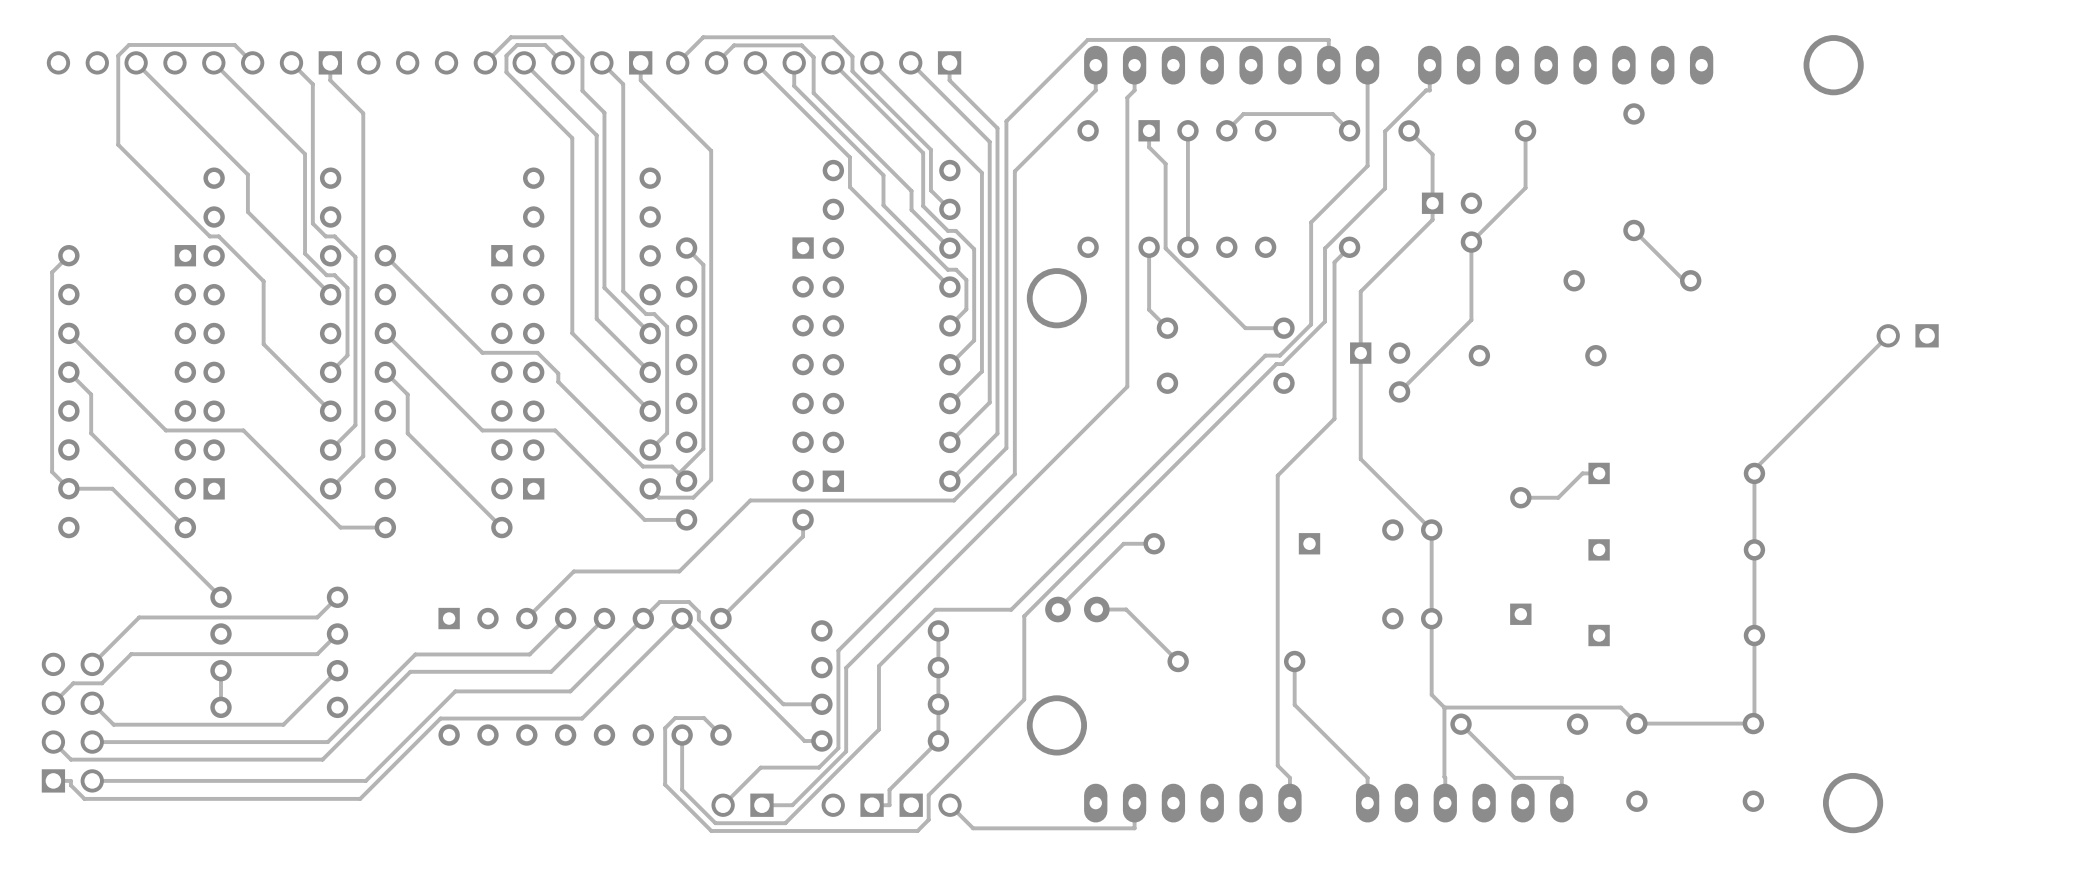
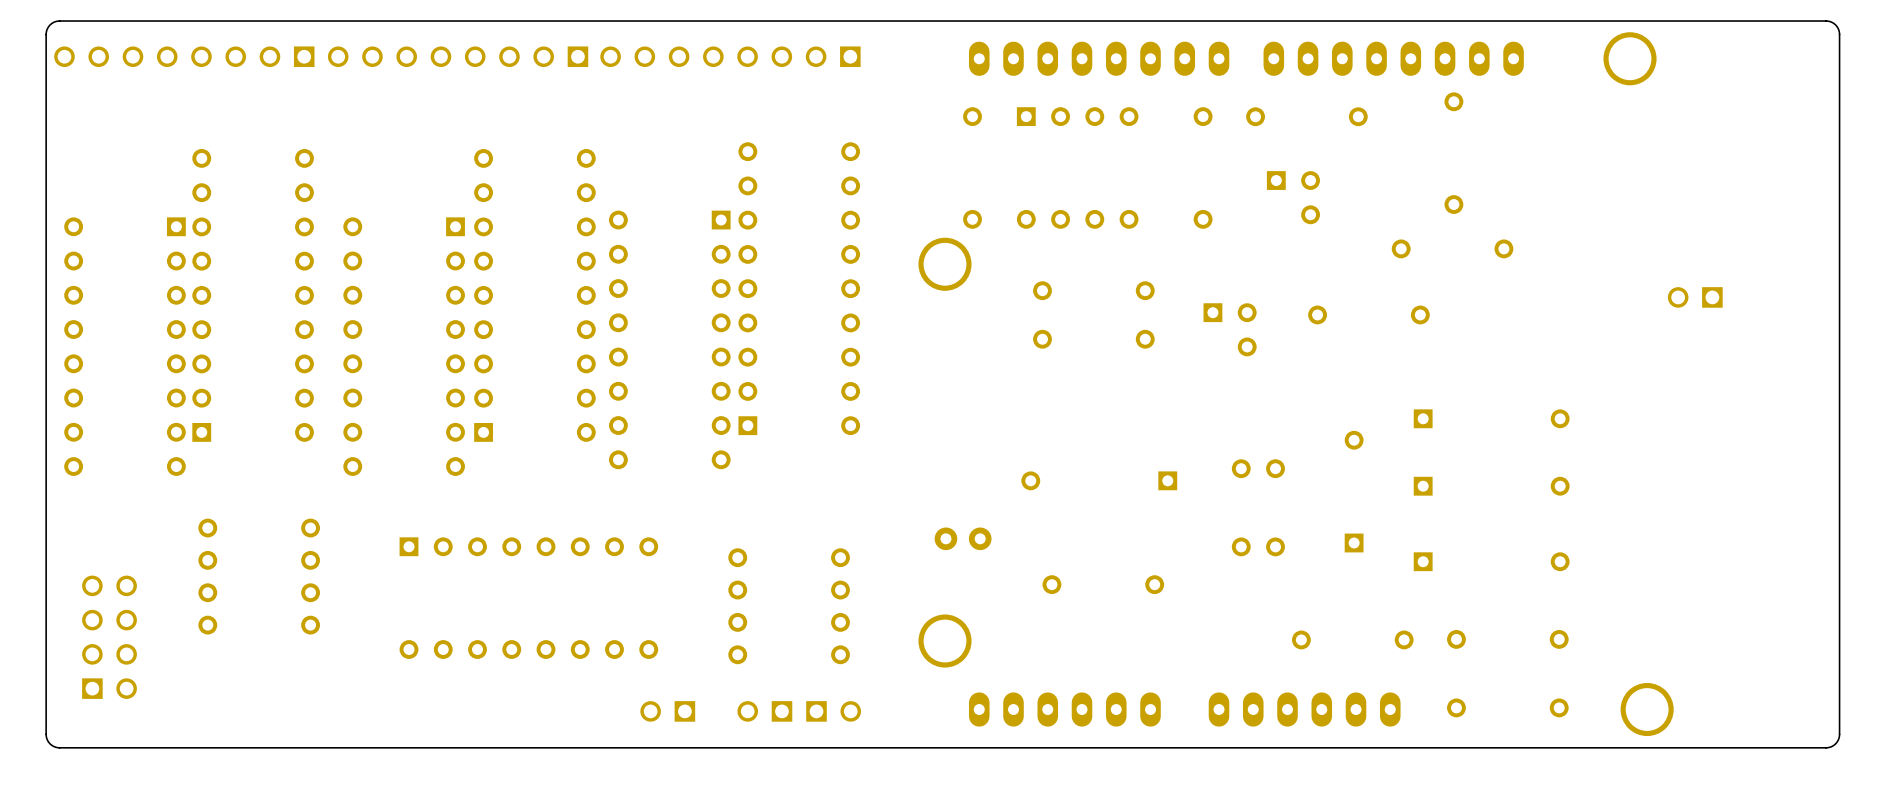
board edge: none -> (1826, 21) (54, 22) (48, 26) (46, 34) (47, 739) (51, 745) (59, 747) (1831, 746) (1836, 742) (1839, 734) (1839, 34) (1835, 24) (1826, 21)
track: (136, 62) (247, 174) (247, 211) (330, 294) -> none
track: (213, 62) (305, 154) (305, 253) (326, 275) (334, 275) (347, 288) (347, 355) (330, 372) -> none
track: (252, 62) (234, 44) (129, 44) (118, 55) (118, 144) (209, 236) (218, 236) (263, 281) (263, 344) (330, 411) -> none
track: (291, 62) (312, 84) (312, 223) (325, 236) (334, 236) (355, 257) (355, 425) (330, 450) -> none
track: (330, 62) (330, 80) (363, 113) (363, 456) (330, 488) -> none
track: (485, 62) (510, 37) (562, 37) (582, 57) (582, 90) (604, 112) (604, 287) (650, 333) -> none
track: (524, 62) (596, 135) (596, 318) (650, 372) -> none
track: (563, 62) (545, 45) (517, 45) (506, 55) (506, 72) (572, 138) (572, 333) (650, 411) -> none
track: (601, 62) (623, 84) (623, 291) (646, 314) (654, 314) (667, 326) (667, 433) (650, 450) -> none
track: (640, 62) (640, 80) (711, 150) (711, 479) (693, 497) (658, 497) (650, 488) -> none
track: (677, 62) (703, 37) (833, 37) (852, 56) (852, 71) (930, 149) (930, 190) (949, 209) -> none
track: (716, 62) (734, 45) (801, 45) (813, 57) (813, 93) (911, 190) (911, 209) (949, 248) -> none
track: (755, 62) (849, 157) (849, 187) (949, 287) -> none
track: (794, 62) (794, 86) (883, 175) (883, 205) (947, 269) (956, 269) (966, 280) (966, 309) (949, 325) -> none
track: (833, 62) (923, 153) (923, 206) (947, 230) (955, 230) (974, 249) (974, 340) (949, 364) -> none
track: (871, 62) (981, 172) (981, 371) (949, 403) -> none
track: (910, 62) (989, 141) (989, 402) (949, 442) -> none
track: (949, 62) (949, 80) (997, 128) (997, 433) (949, 481) -> none
track: (1095, 65) (1095, 90) (1014, 171) (1014, 474) (838, 650) (838, 748) (819, 767) (760, 767) (723, 805) -> none
track: (1134, 65) (1134, 90) (1127, 97) (1127, 386) (846, 667) (846, 751) (792, 805) (761, 805) -> none
track: (1328, 65) (1328, 39) (1087, 39) (1006, 121) (1006, 448) (953, 500) (750, 500) (679, 571) (573, 571) (526, 618) -> none
track: (1367, 65) (1367, 165) (1311, 222) (1311, 324) (1279, 355) (1265, 355) (1011, 609) (935, 609) (878, 666) (878, 729) (785, 823) (715, 823) (682, 789) (682, 735) -> none
track: (1429, 65) (1429, 90) (1426, 90) (1385, 131) (1385, 188) (1325, 248) (1325, 321) (1282, 364) (1276, 364) (1024, 616) (1024, 699) (928, 795) (928, 819) (917, 830) (711, 830) (665, 784) (665, 728) (675, 718) (703, 718) (720, 735) -> none
track: (1149, 130) (1149, 147) (1165, 163) (1165, 248) (1245, 328) (1283, 328) -> none
track: (1187, 130) (1187, 247) -> none
track: (1349, 130) (1332, 114) (1243, 114) (1226, 130) -> none
track: (1409, 130) (1432, 154) (1432, 219) (1360, 291) (1360, 459) (1431, 530) (1431, 694) (1444, 707) -> none
track: (1525, 130) (1525, 187) (1471, 242) (1471, 320) (1399, 391) -> none
track: (1633, 230) (1684, 280) (1690, 280) -> none
track: (1149, 247) (1149, 309) (1167, 328) -> none
track: (1349, 247) (1334, 262) (1334, 418) (1277, 475) (1277, 765) (1289, 777) (1289, 803) -> none
track: (686, 248) (703, 264) (703, 449) (679, 473) -> none
track: (68, 255) (52, 272) (52, 471) (68, 488) (112, 488) (220, 597) -> none
track: (385, 255) (482, 352) (537, 352) (558, 373) (558, 381) (642, 466) (672, 466) (686, 481) -> none
track: (68, 333) (165, 430) (243, 430) (340, 527) (385, 527) -> none
track: (385, 333) (482, 430) (555, 430) (644, 519) (686, 519) -> none
track: (1888, 335) (1754, 469) (1753, 723) (1636, 723) (1620, 707) (1444, 707) -> none
track: (68, 372) (91, 394) (91, 433) (185, 527) -> none
track: (385, 372) (407, 394) (407, 433) (501, 527) -> none
track: (1599, 473) (1582, 473) (1558, 497) (1520, 497) -> none
track: (803, 519) (803, 536) (720, 618) -> none
track: (1154, 543) (1123, 543) (1057, 609) -> none
track: (337, 597) (317, 617) (139, 617) (92, 664) -> none
track: (1096, 609) (1126, 609) (1178, 661) -> none
track: (565, 618) (529, 654) (415, 654) (327, 742) (92, 742) -> none
track: (604, 618) (551, 671) (410, 671) (322, 759) (70, 759) (53, 742) -> none
track: (938, 630) (938, 741) (889, 789) (889, 805) (872, 805) -> none
track: (337, 633) (317, 654) (131, 654) (102, 683) (73, 683) (53, 703) -> none
track: (1294, 661) (1294, 704) (1367, 777) (1367, 803) -> none
track: (220, 670) (220, 707) -> none
track: (337, 670) (283, 724) (113, 724) (92, 703) -> none
track: (821, 704) (783, 704) (698, 619) (698, 611) (688, 602) (659, 602) (570, 691) (455, 691) (365, 780) (92, 780) -> none
track: (1444, 707) (1445, 803) -> none
part position: (72, 722) -> (109, 637)
track: (1461, 724) (1514, 777) (1561, 777) (1561, 803) -> none
track: (821, 741) (804, 741) (682, 618) (582, 718) (440, 718) (360, 798) (84, 798) (70, 785) (70, 780) (53, 780) -> none
track: (1134, 803) (1134, 828) (973, 828) (950, 805) -> none

